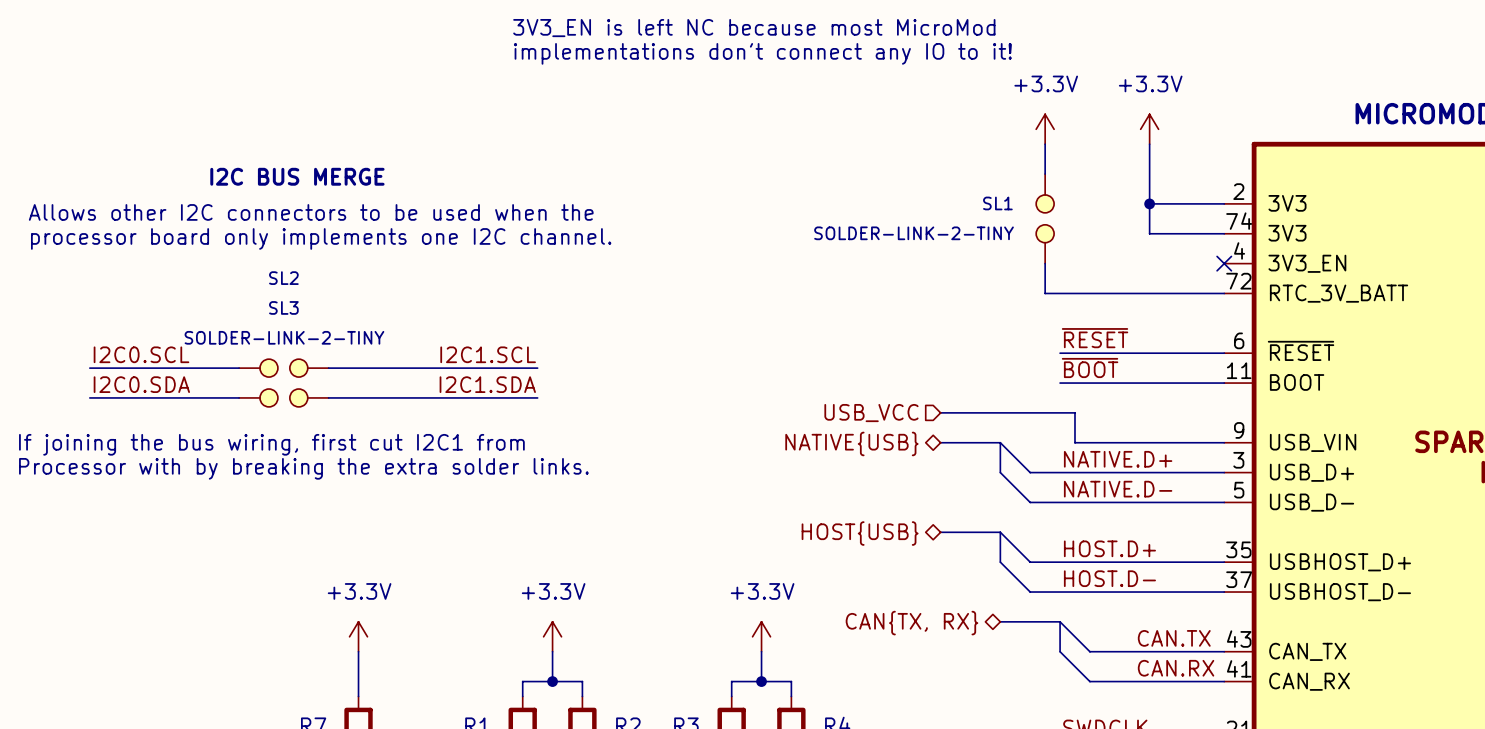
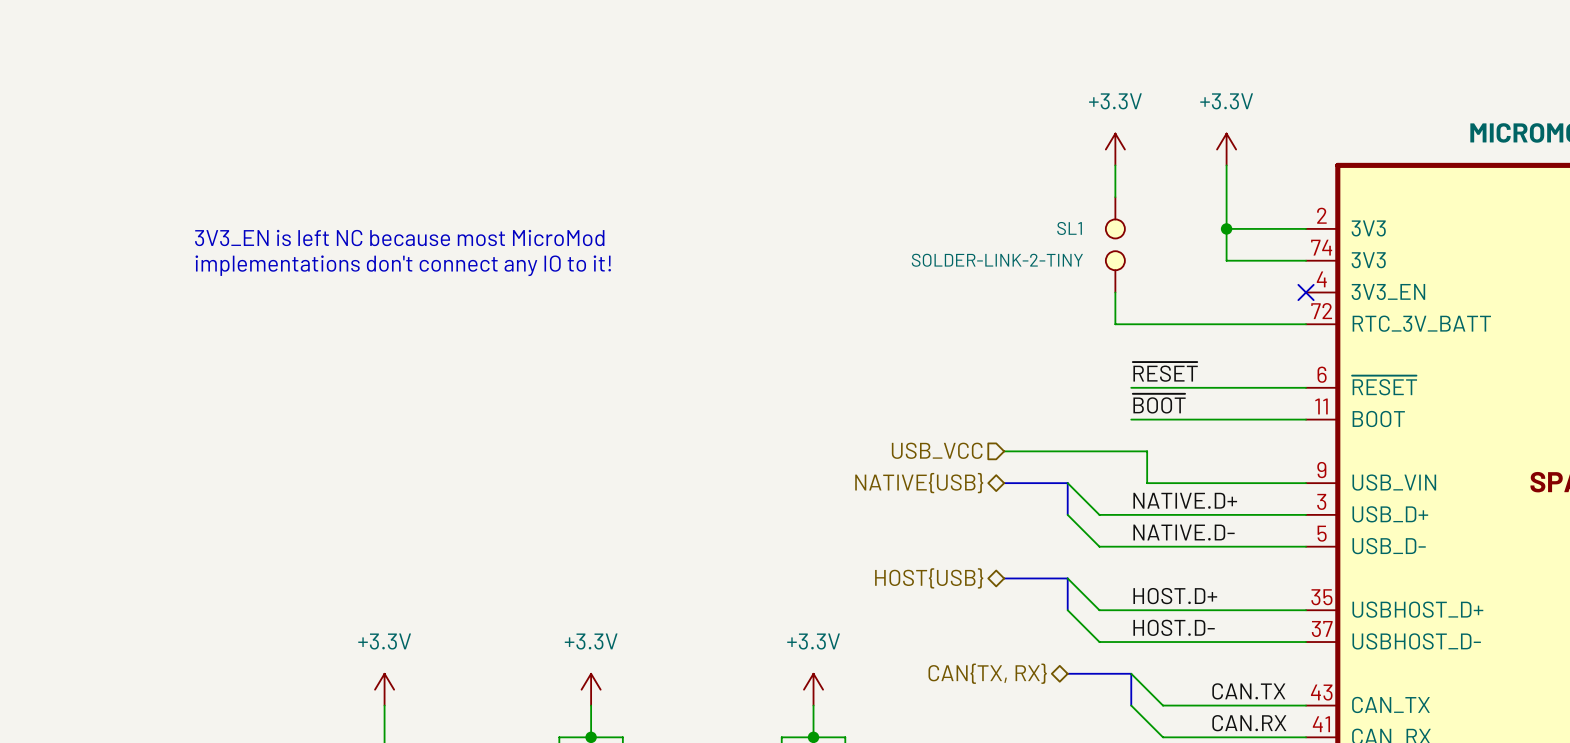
text: 3V3_EN is left NC because most MicroMod (754, 28) -> none
text: implementations don't connect any IO to it! (762, 53) -> none
text: I2C BUS MERGE (297, 176) -> none
text: Allows other I2C connectors to be used when the (311, 212) -> none
text: none -> 3V3_EN is left NC because most MicroMod (399, 238)
text: processor board only implements one I2C channel. (321, 238) -> none
text: none -> implementations don't connect any IO to it! (403, 265)
label: I2C0.SCL (141, 354) -> none
label: I2C1.SCL (488, 354) -> none
wire: (89, 368) (239, 368) -> none
SL2: SOLDER-LINK-2-TINY (283, 368) -> none
wire: (328, 368) (537, 368) -> none
label: I2C0.SDA (141, 384) -> none
label: I2C1.SDA (487, 384) -> none
wire: (89, 397) (239, 397) -> none
SL3: (283, 397) -> none
wire: (328, 397) (537, 397) -> none
text: If joining the bus wiring, first cut I2C1 from (271, 444) -> none
text: Processor with by breaking the extra solder links. (303, 468) -> none

